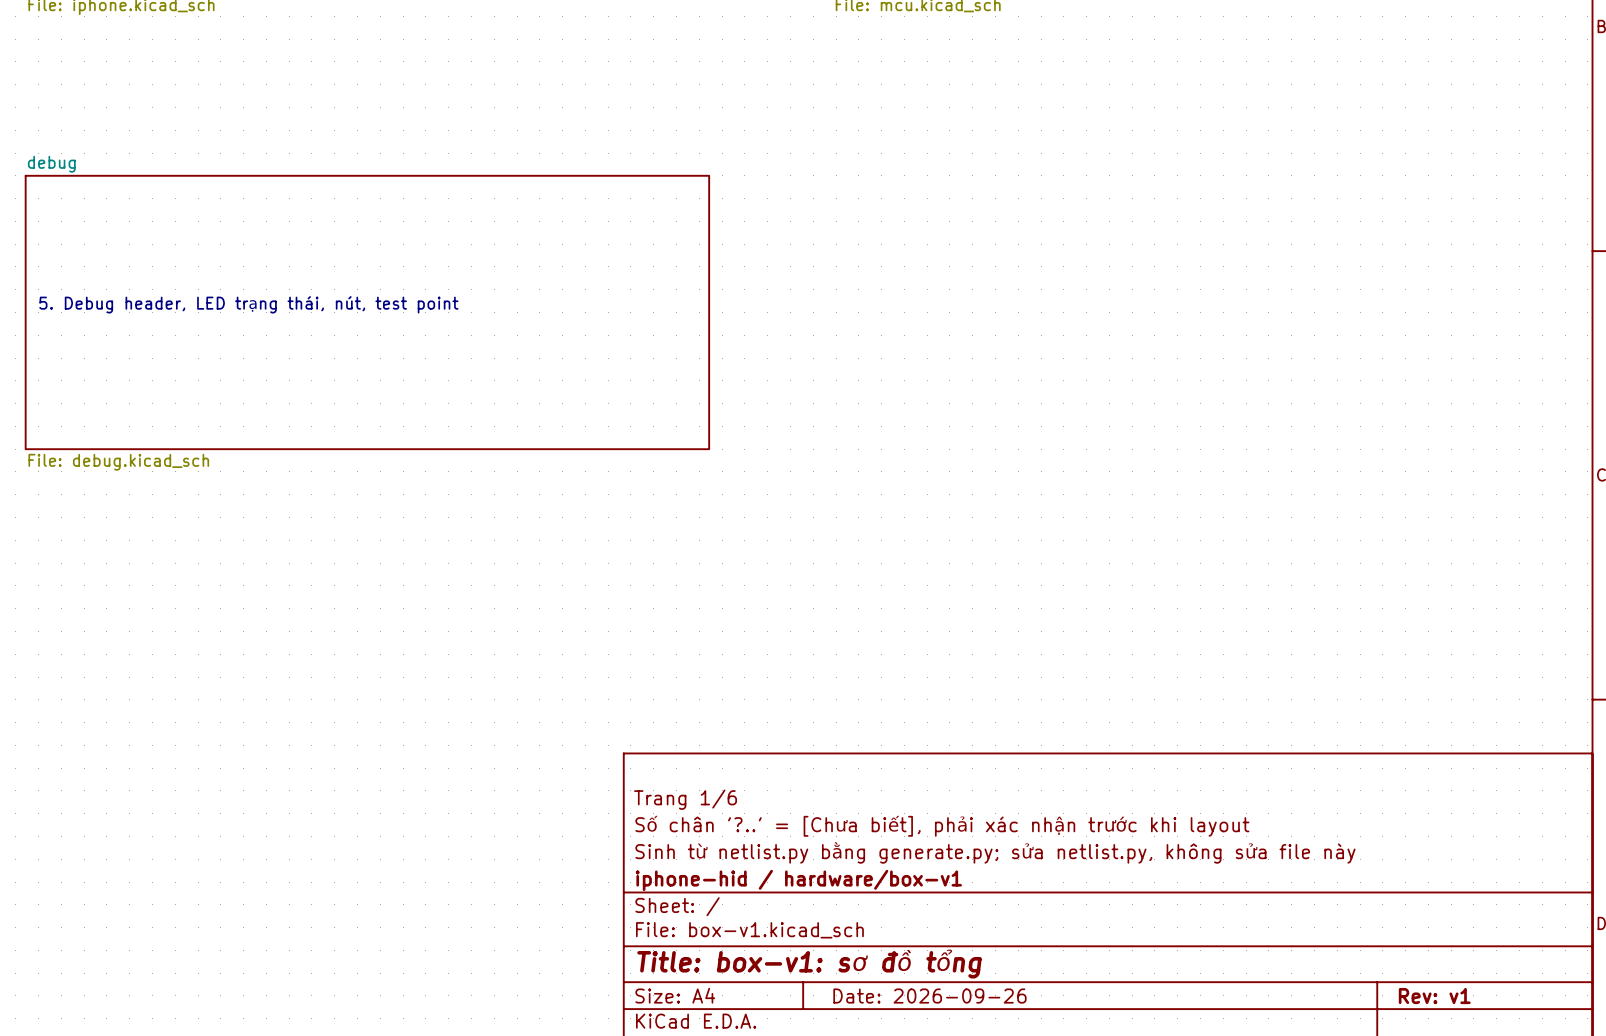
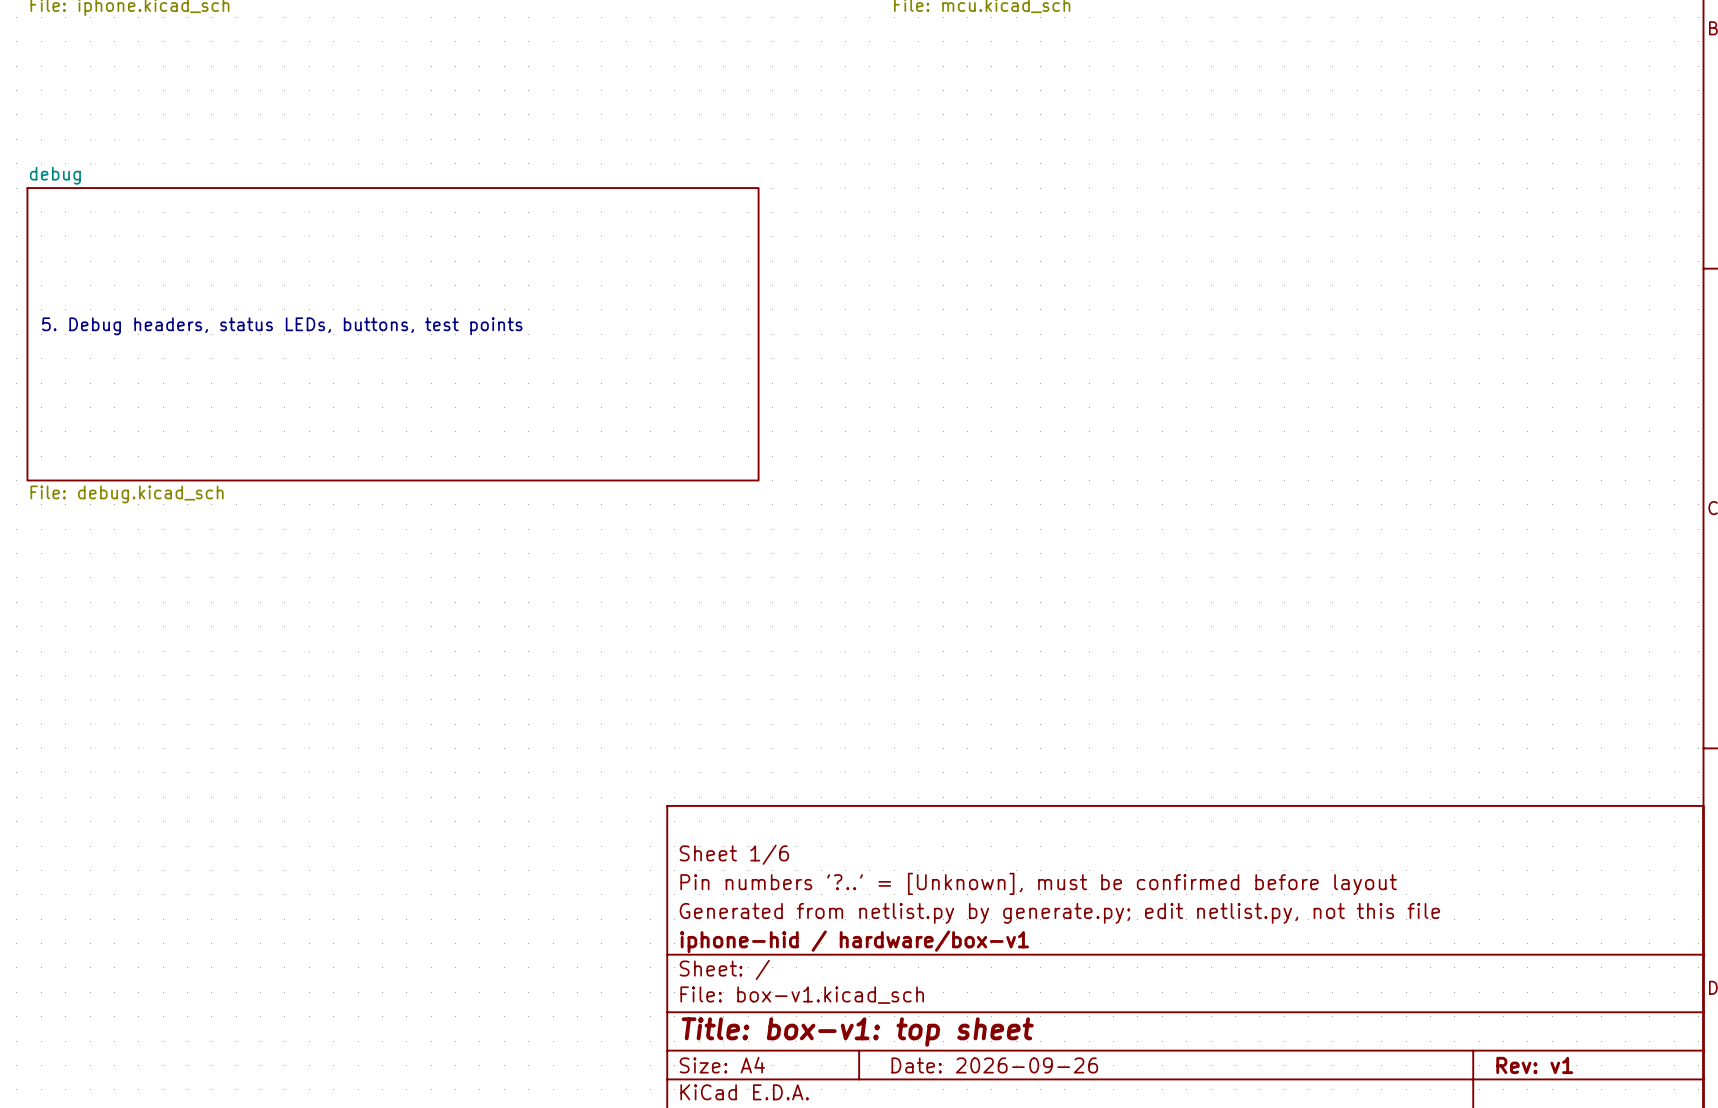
text: 5. Debug header, LED trạng thái, nút, test point (248, 304) -> 5. Debug headers, status LEDs, buttons, test points (282, 326)
title block: Trang 1/6 (685, 799) -> Sheet 1/6 (734, 854)
title block: Số chân '?..' = [Chưa biết], phải xác nhận trước khi layout (942, 825) -> Pin numbers '?..' = [Unknown], must be confirmed before layout (1038, 883)
title block: Sinh từ netlist.py bằng generate.py; sửa netlist.py, không sửa file này (995, 852) -> Generated from netlist.py by generate.py; edit netlist.py, not this file (1059, 913)
title block: Title: box-v1: sơ đồ tổng (809, 963) -> Title: box-v1: top sheet (857, 1032)

